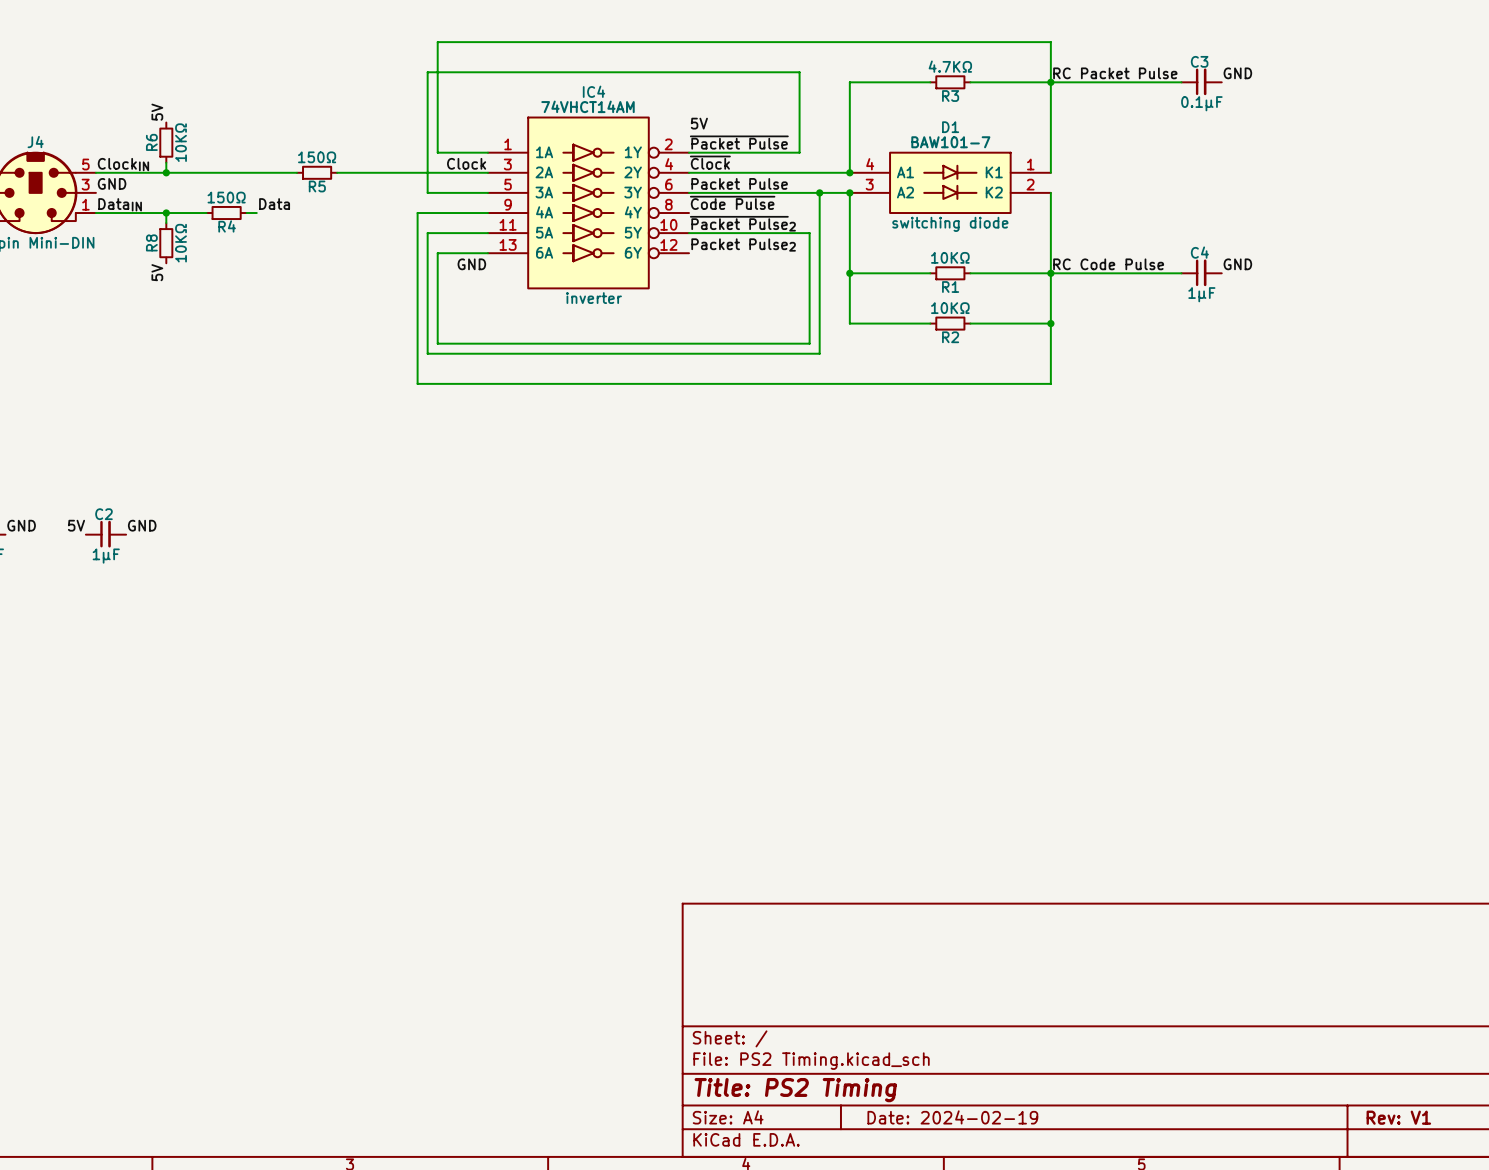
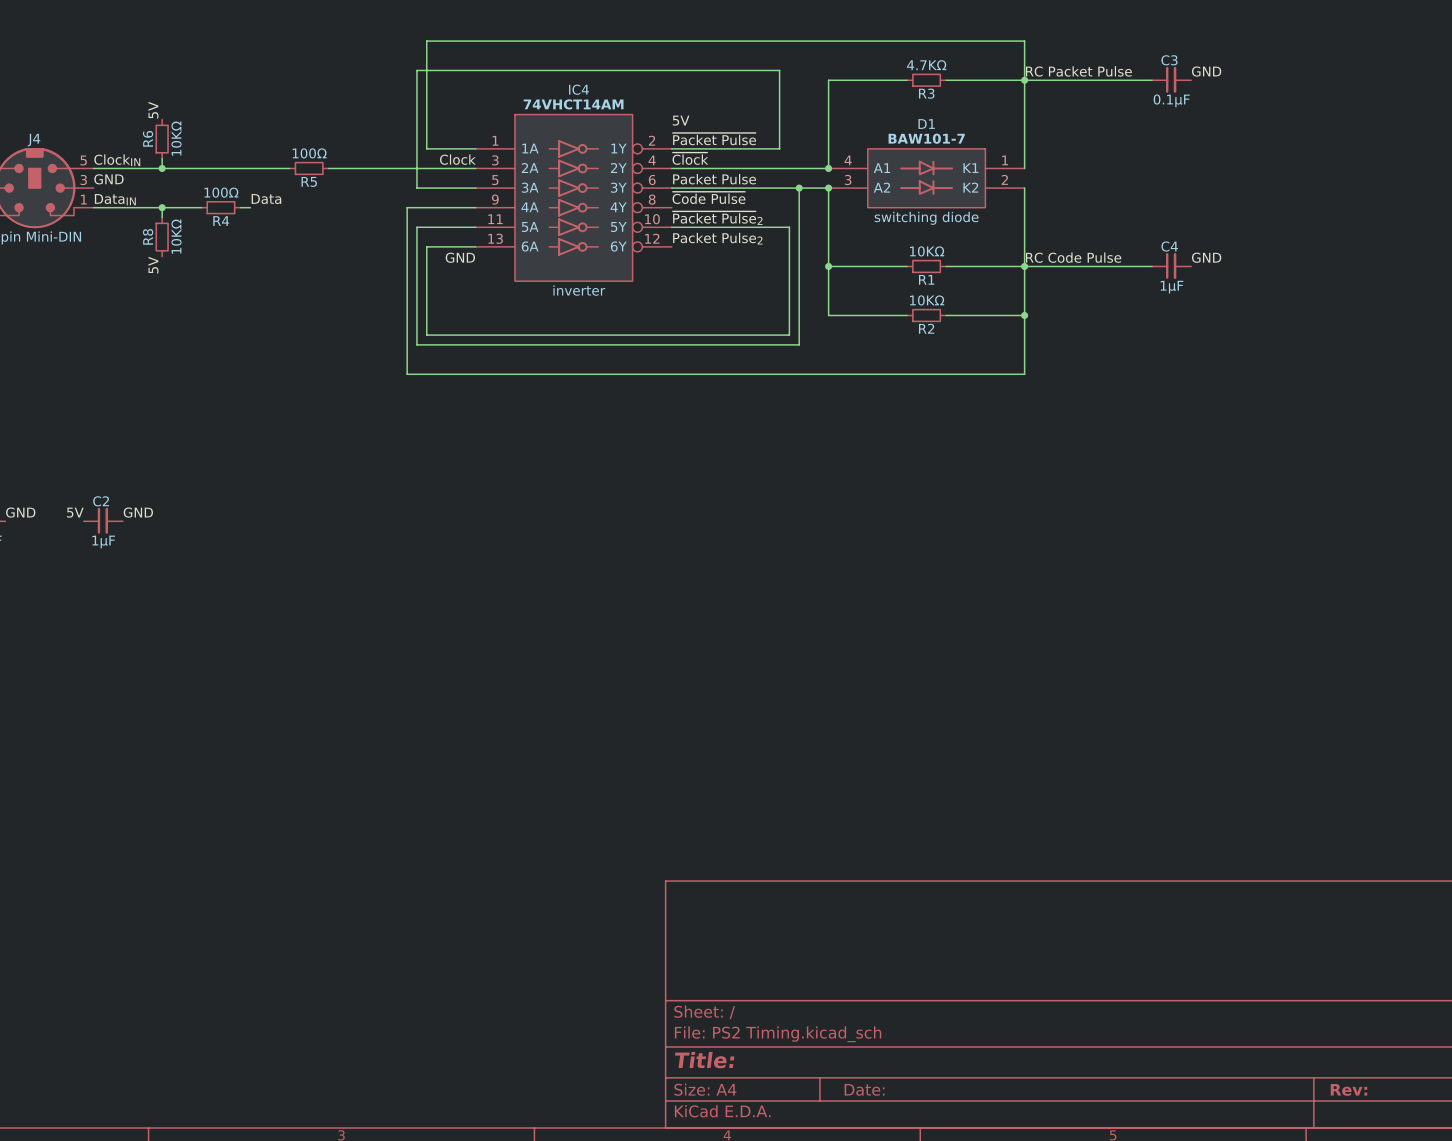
R5 value: 150Ω (317, 157) -> 100Ω (309, 153)
R4 value: 150Ω (226, 197) -> 100Ω (221, 192)
title block: Title: PS2 Timing (795, 1090) -> Title: (704, 1060)
title block: Date: 2024-02-19 (952, 1117) -> Date: (864, 1089)
title block: Rev: V1 (1398, 1117) -> Rev: (1348, 1089)

